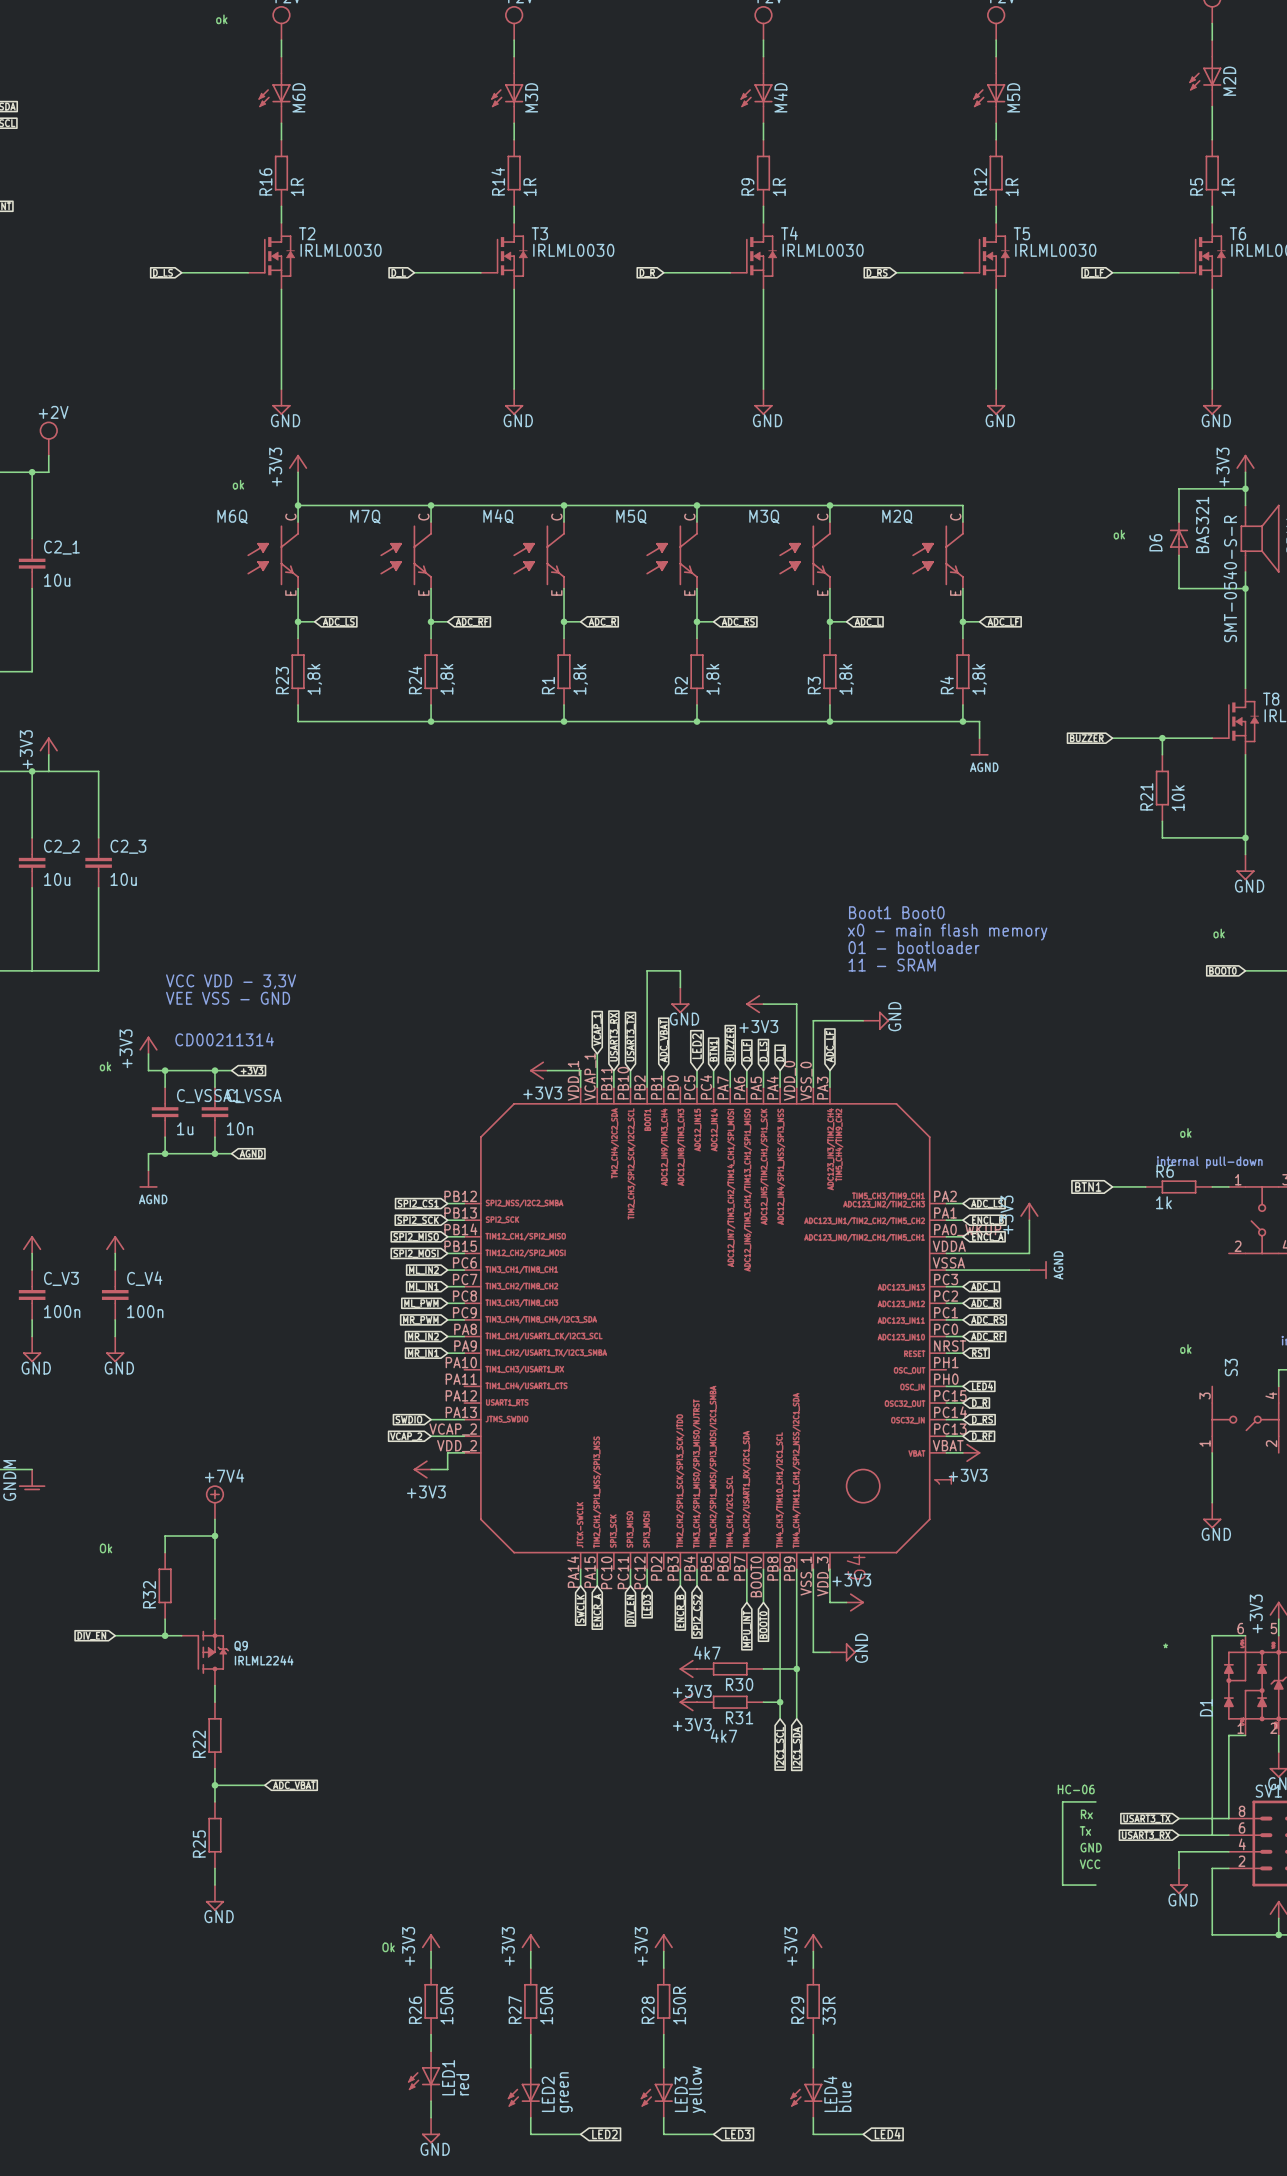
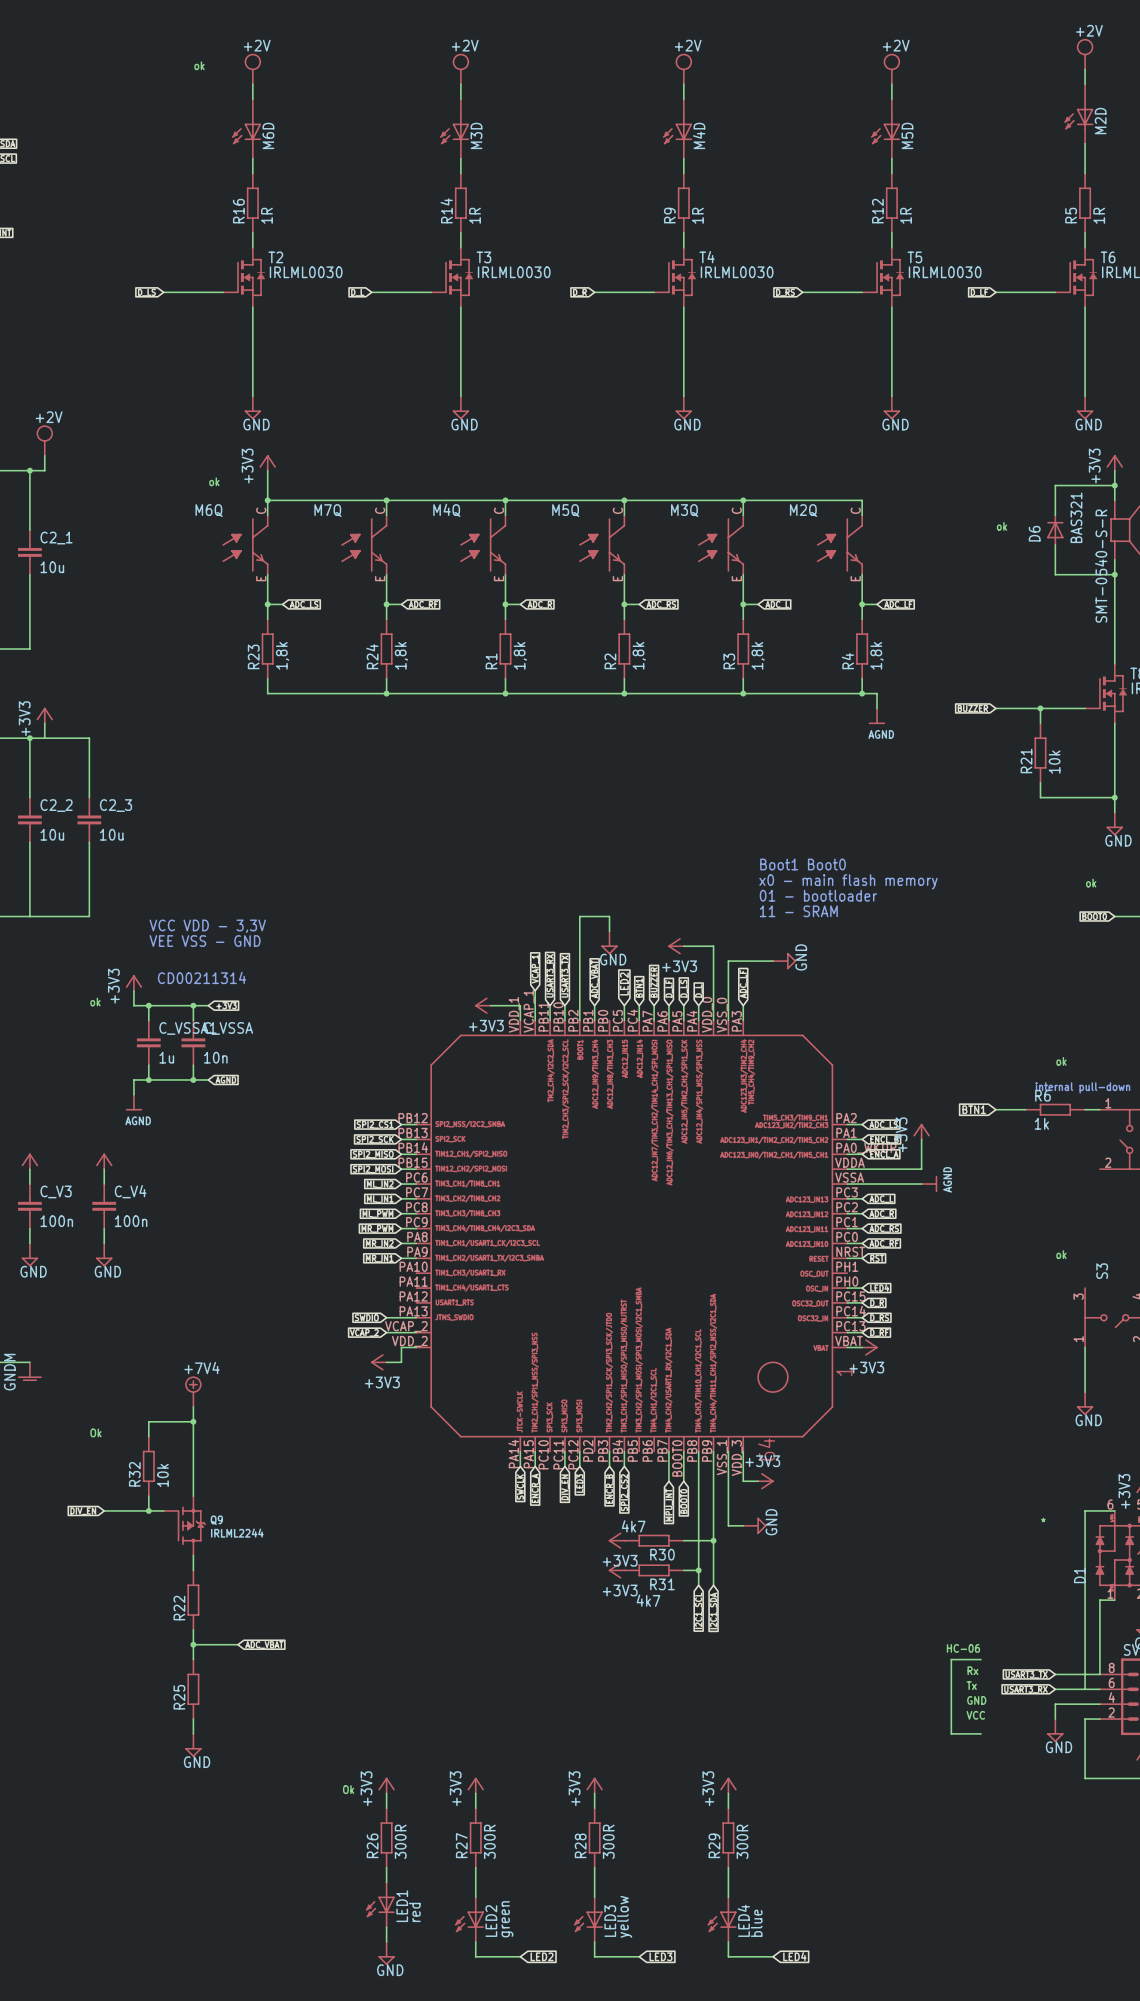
R32 value: none -> 10k (162, 1475)
R26 value: 150R (446, 2005) -> 300R (400, 1841)
R27 value: 150R (546, 2005) -> 300R (489, 1841)
R28 value: 150R (679, 2005) -> 300R (608, 1841)
R29 value: 33R (829, 2010) -> 300R (742, 1841)

